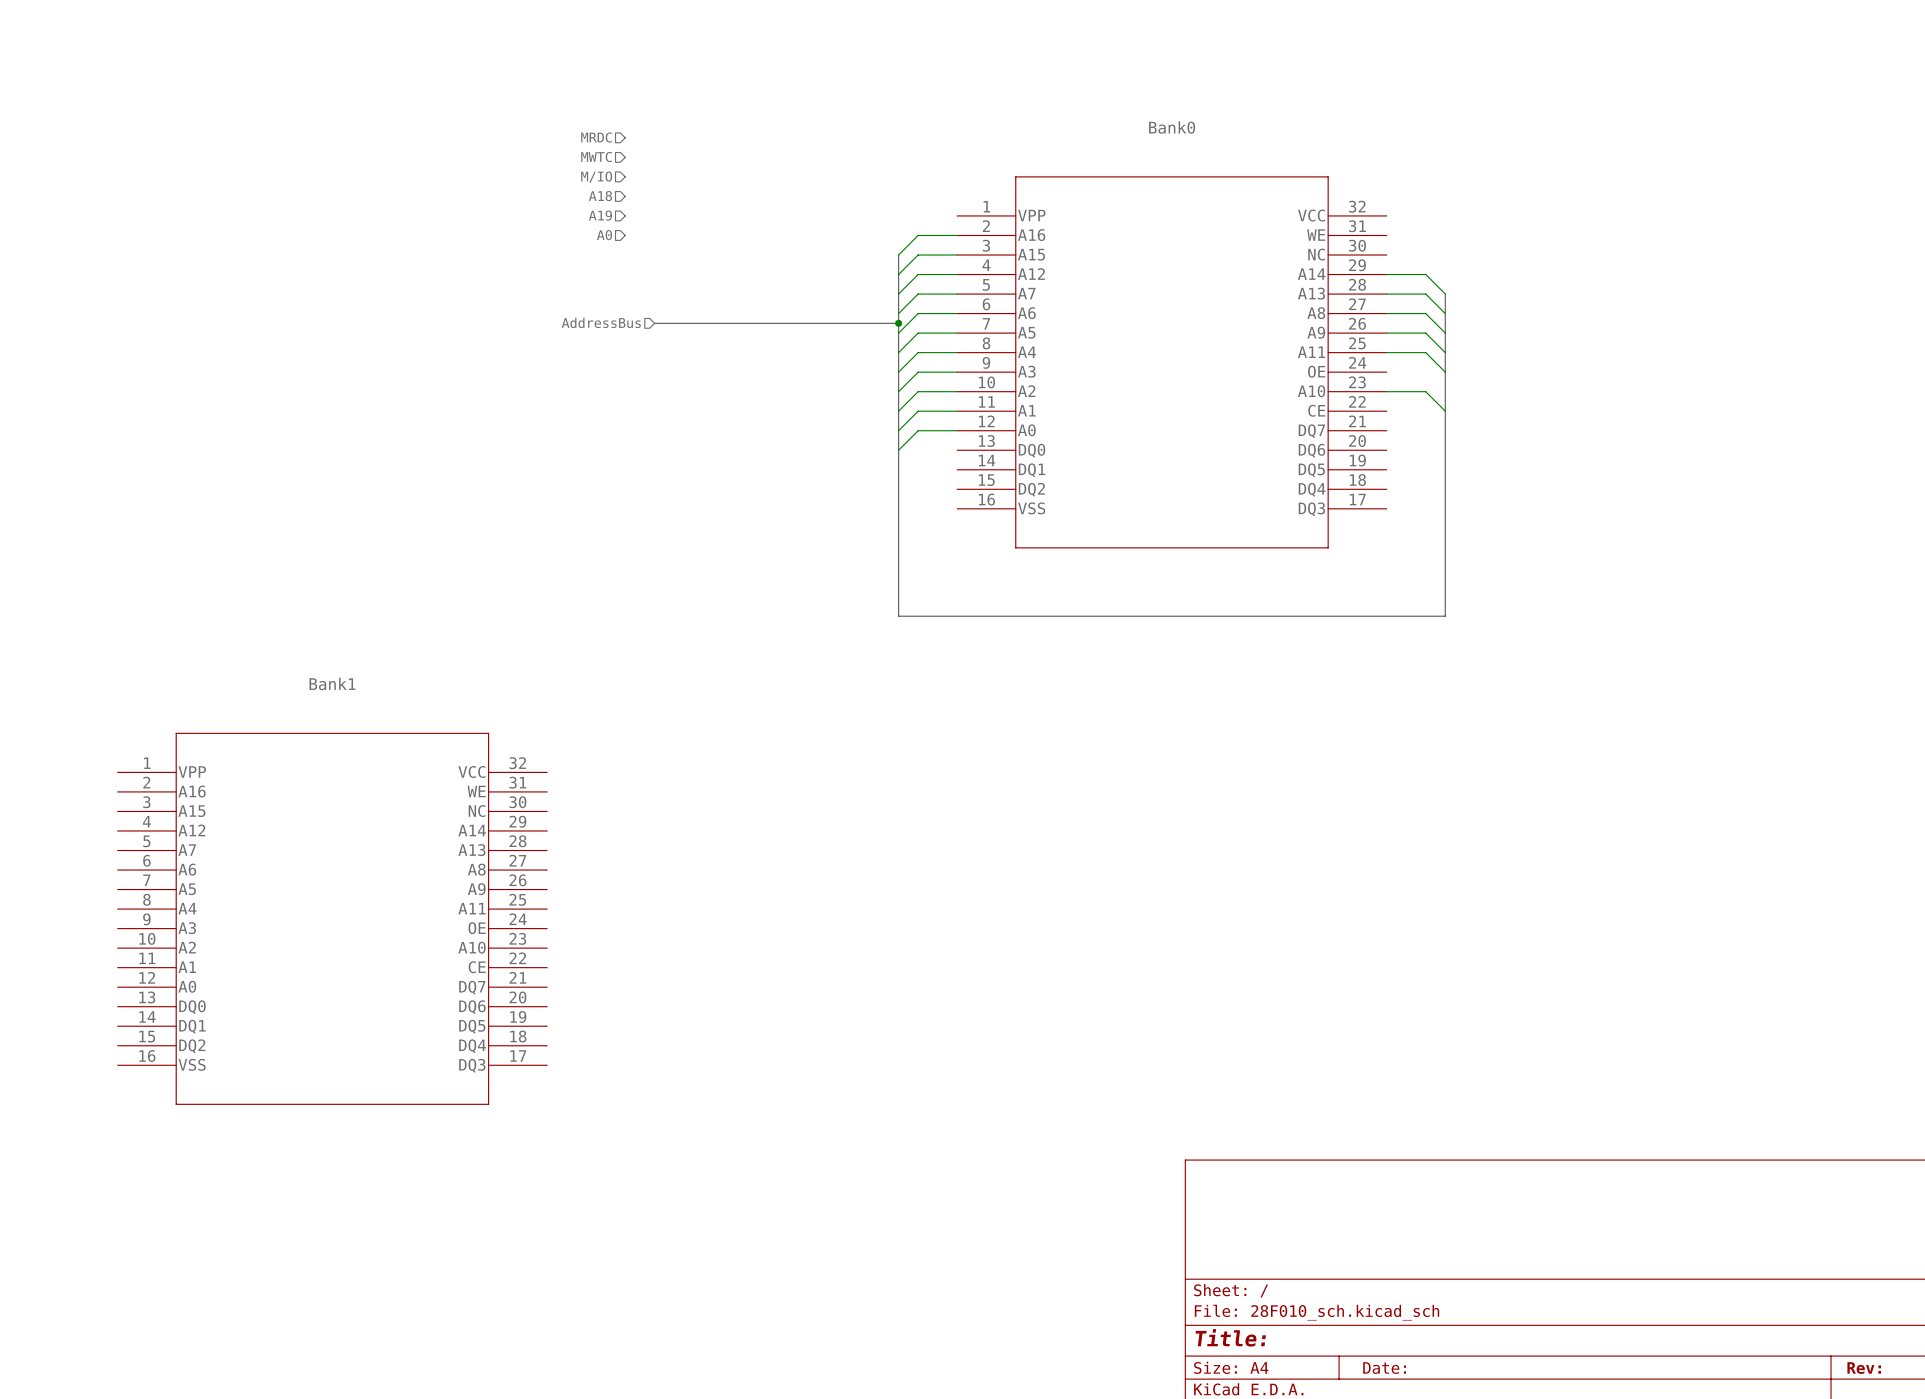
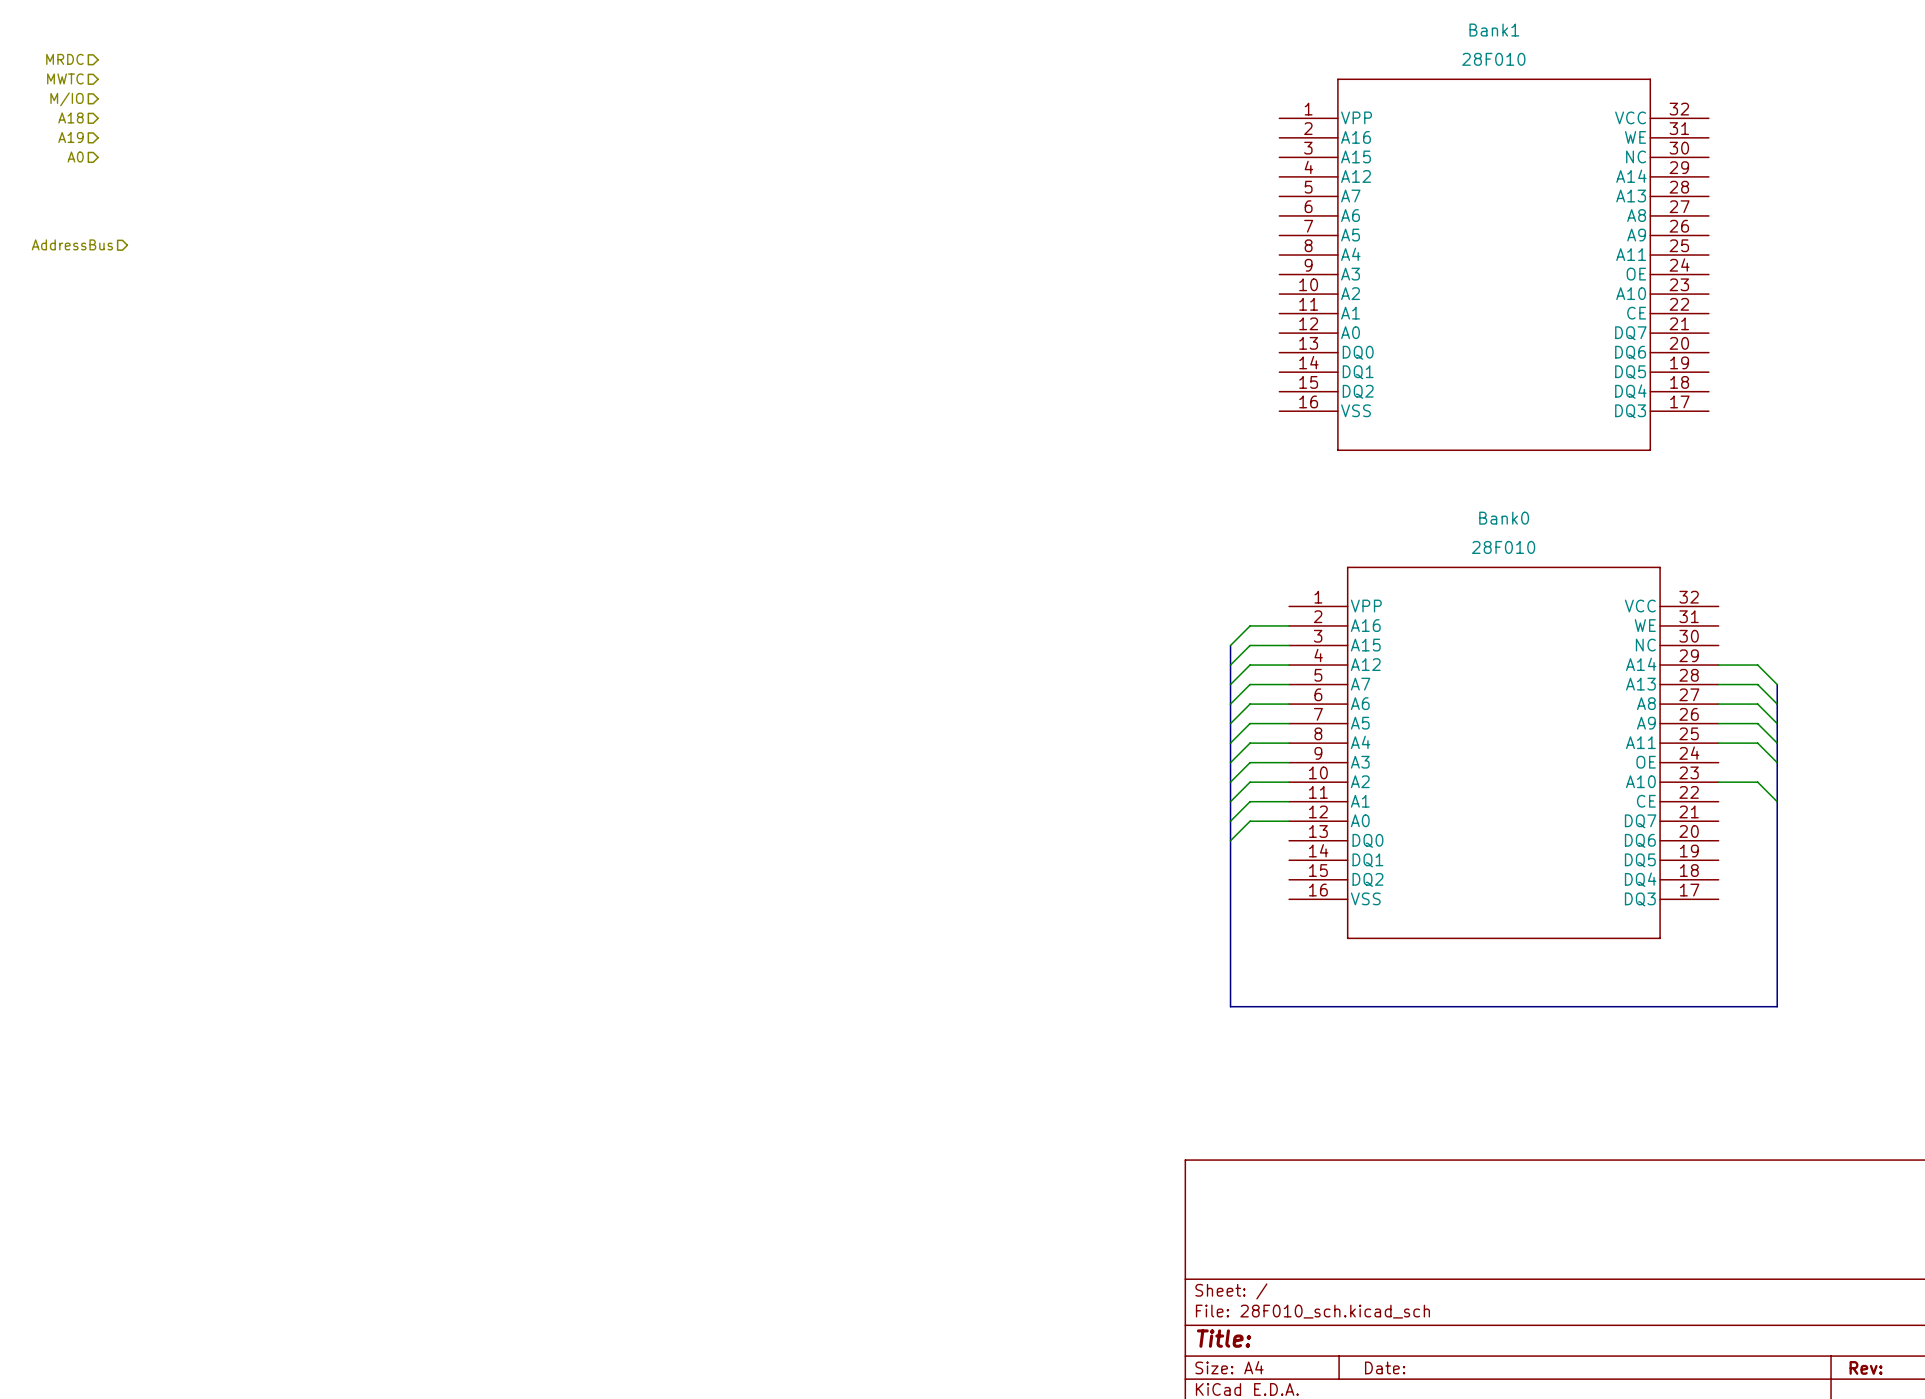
hierarchical label: none -> MRDC (64, 59)
Bank1 value: none -> 28F010 (1493, 59)
hierarchical label: none -> MWTC (65, 78)
hierarchical label: none -> M/IO (67, 99)
hierarchical label: none -> A18 (70, 117)
hierarchical label: none -> A19 (70, 137)
hierarchical label: MRDC (596, 137) -> none
hierarchical label: none -> A0 (75, 157)
hierarchical label: MWTC (596, 157) -> none
hierarchical label: M/IO (596, 177) -> none
hierarchical label: A18 (600, 196) -> none
hierarchical label: A19 (600, 215) -> none
hierarchical label: A0 (604, 235) -> none
wire: (957, 235) (918, 235) (898, 255) -> none
hierarchical label: none -> AddressBus (72, 244)
bus: (898, 255) (898, 616) (1445, 616) (1445, 294) -> none
wire: (957, 255) (918, 255) (898, 274) -> none
wire: (957, 274) (918, 274) (898, 294) -> none
wire: (1386, 274) (1425, 274) (1445, 294) -> none
wire: (957, 294) (918, 294) (898, 313) -> none
wire: (1386, 294) (1425, 294) (1445, 313) -> none
wire: (957, 313) (918, 313) (898, 333) -> none
wire: (1386, 313) (1425, 313) (1445, 333) -> none
hierarchical label: AddressBus (601, 322) -> none
bus: (654, 323) (898, 323) -> none
junction: (898, 323) -> none
wire: (957, 333) (918, 333) (898, 352) -> none
wire: (1386, 333) (1425, 333) (1445, 352) -> none
wire: (957, 352) (918, 352) (898, 372) -> none
wire: (1386, 352) (1425, 352) (1445, 372) -> none
Bank0 position: (1171, 362) -> (1503, 752)
wire: (957, 372) (918, 372) (898, 391) -> none
wire: (957, 391) (918, 391) (898, 411) -> none
wire: (1386, 391) (1425, 391) (1445, 411) -> none
wire: (957, 411) (918, 411) (898, 430) -> none
wire: (957, 430) (918, 430) (898, 450) -> none
Bank0 value: none -> 28F010 (1503, 547)
wire: none -> (1289, 625) (1250, 625) (1230, 645)
bus: none -> (1230, 645) (1230, 1006) (1777, 1006) (1777, 684)
wire: none -> (1289, 645) (1250, 645) (1230, 665)
wire: none -> (1289, 665) (1250, 665) (1230, 684)
wire: none -> (1718, 665) (1757, 665) (1777, 684)
wire: none -> (1289, 684) (1250, 684) (1230, 704)
wire: none -> (1718, 684) (1757, 684) (1777, 704)
wire: none -> (1289, 704) (1250, 704) (1230, 723)
wire: none -> (1718, 704) (1757, 704) (1777, 723)
wire: none -> (1289, 723) (1250, 723) (1230, 743)
wire: none -> (1718, 723) (1757, 723) (1777, 743)
wire: none -> (1289, 743) (1250, 743) (1230, 762)
wire: none -> (1718, 743) (1757, 743) (1777, 762)
wire: none -> (1289, 762) (1250, 762) (1230, 782)
wire: none -> (1289, 782) (1250, 782) (1230, 801)
wire: none -> (1718, 782) (1757, 782) (1777, 801)
wire: none -> (1289, 801) (1250, 801) (1230, 821)
wire: none -> (1289, 821) (1250, 821) (1230, 840)
Bank1 position: (332, 918) -> (1494, 264)

